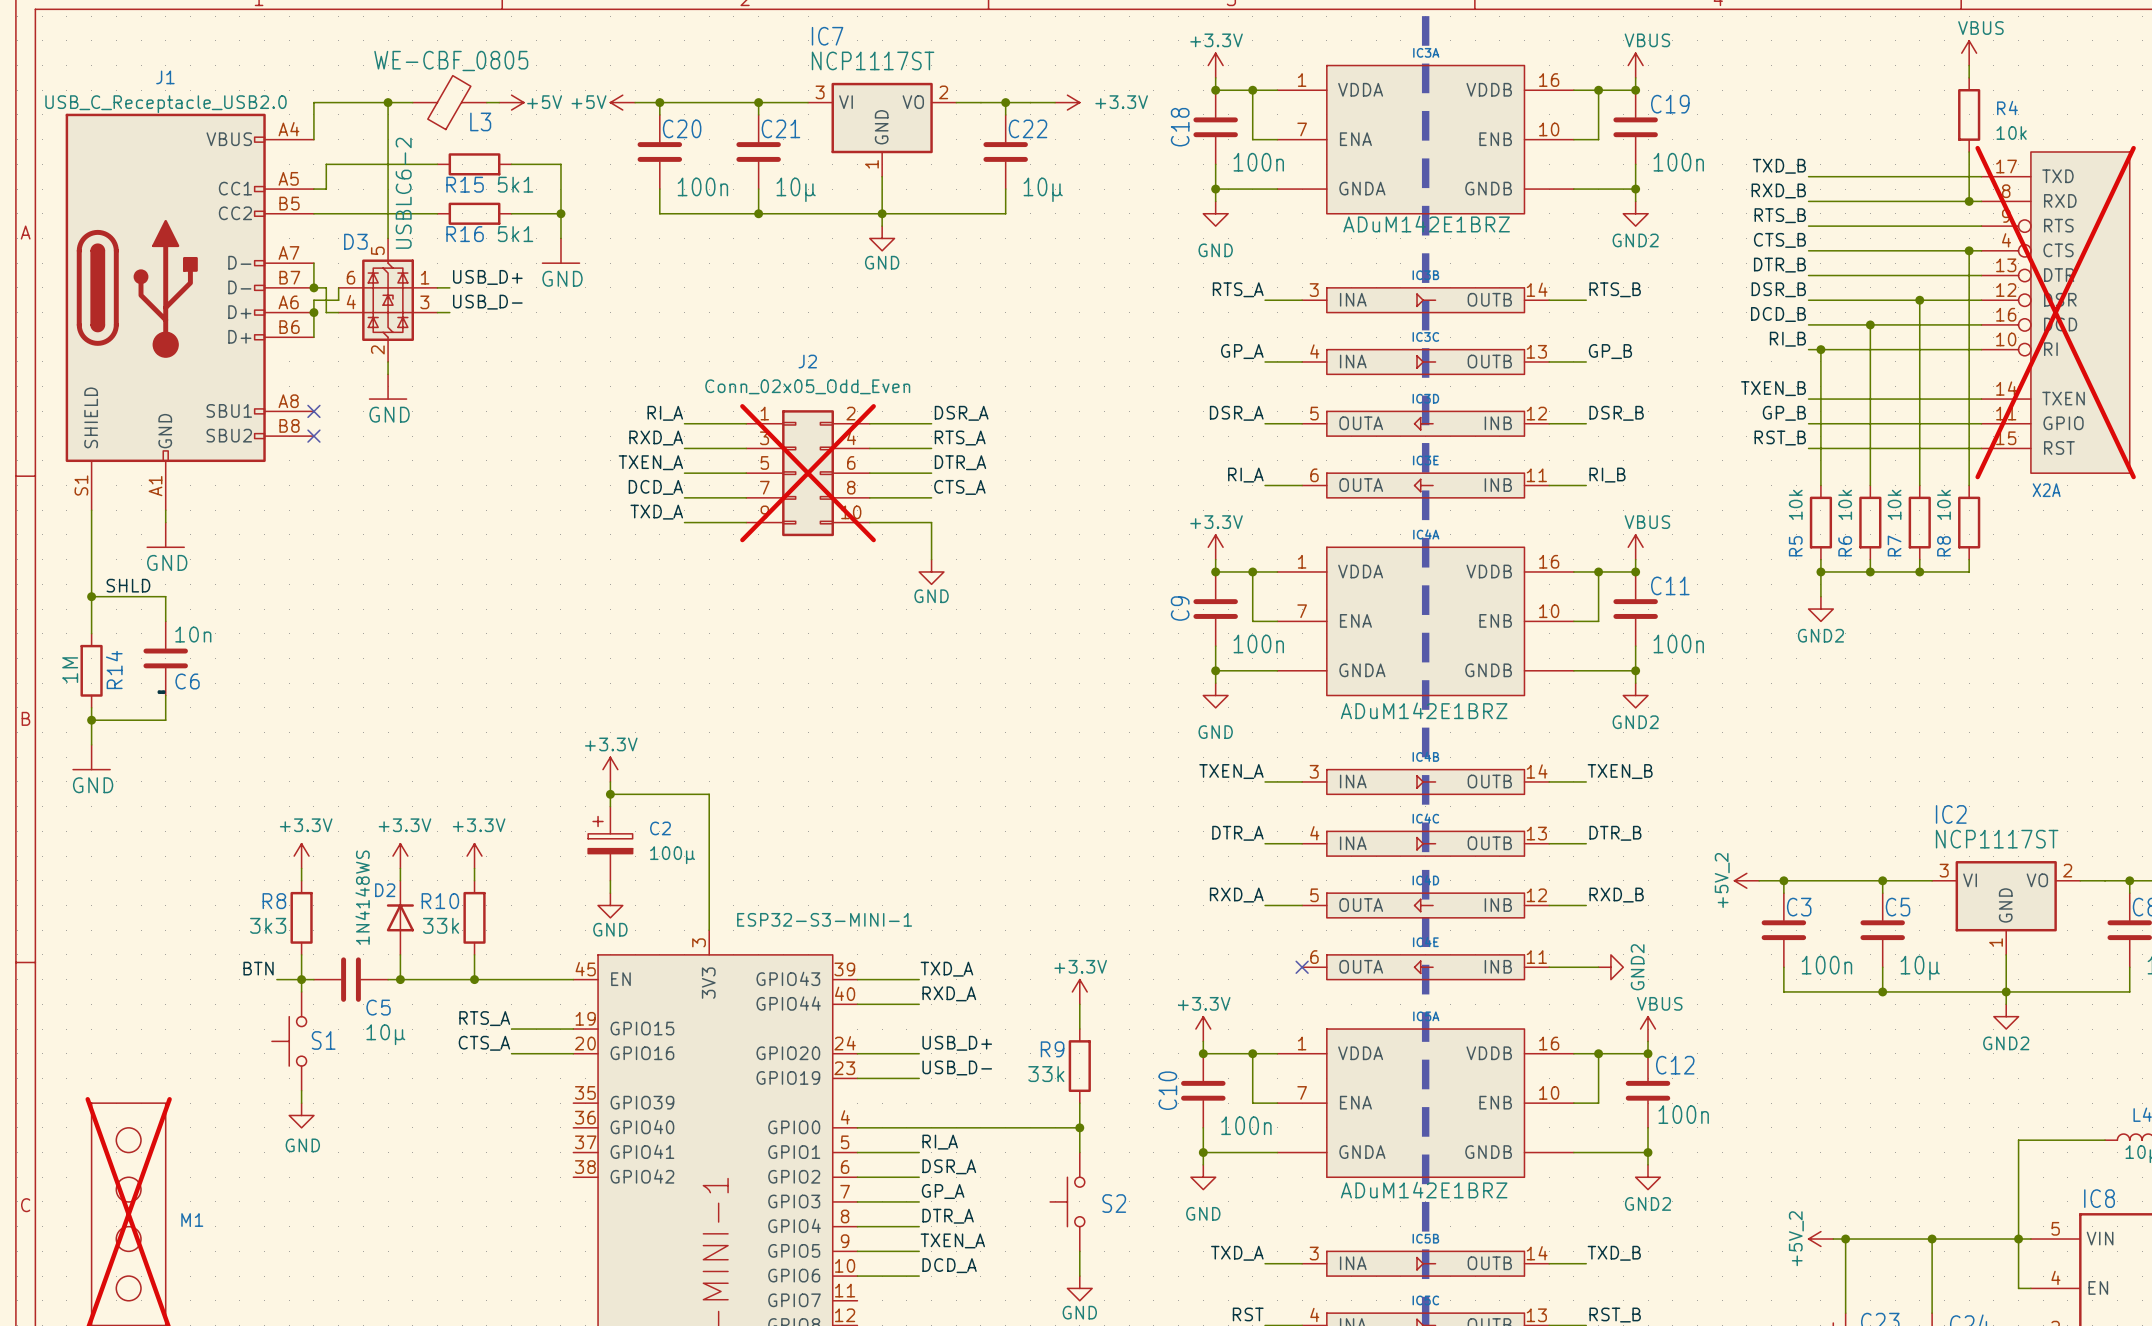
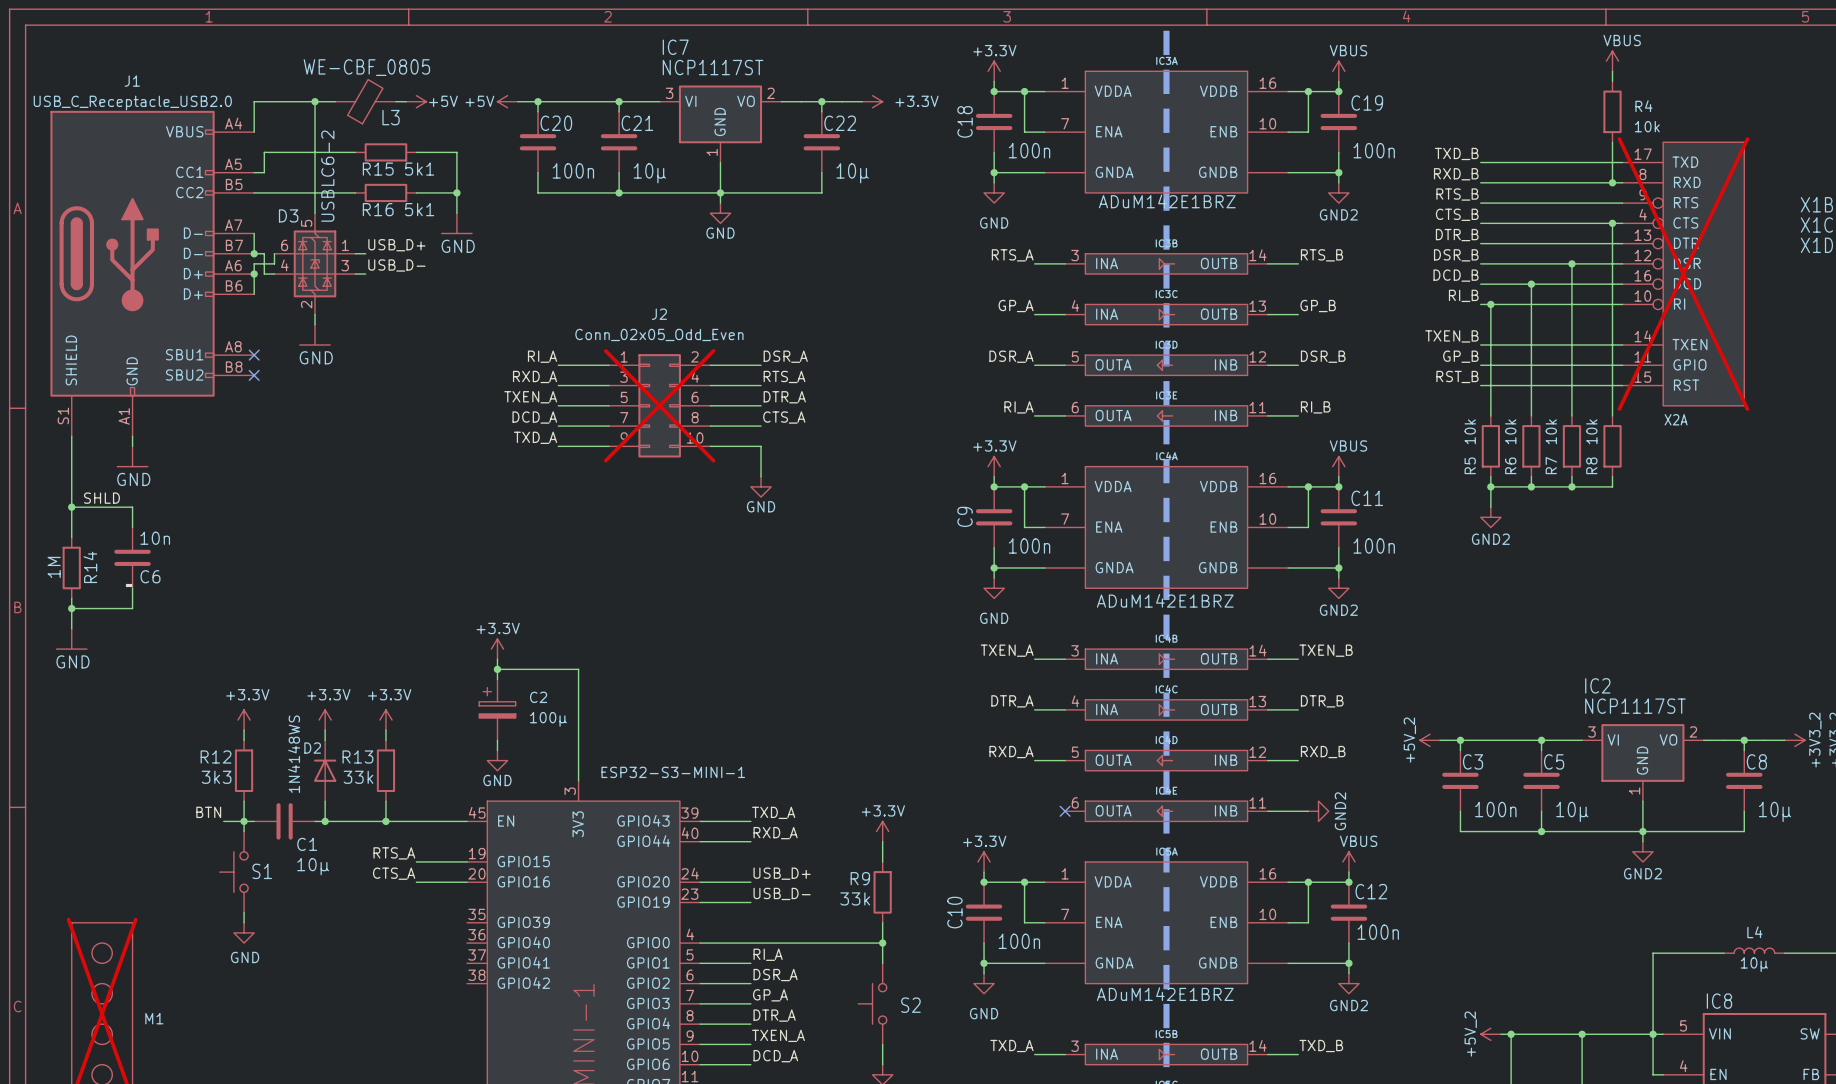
R8 name: R8 (274, 901) -> R12 (216, 757)
R10 name: R10 (440, 901) -> R13 (357, 757)
C5 name: C5 (378, 1007) -> C1 (307, 844)

